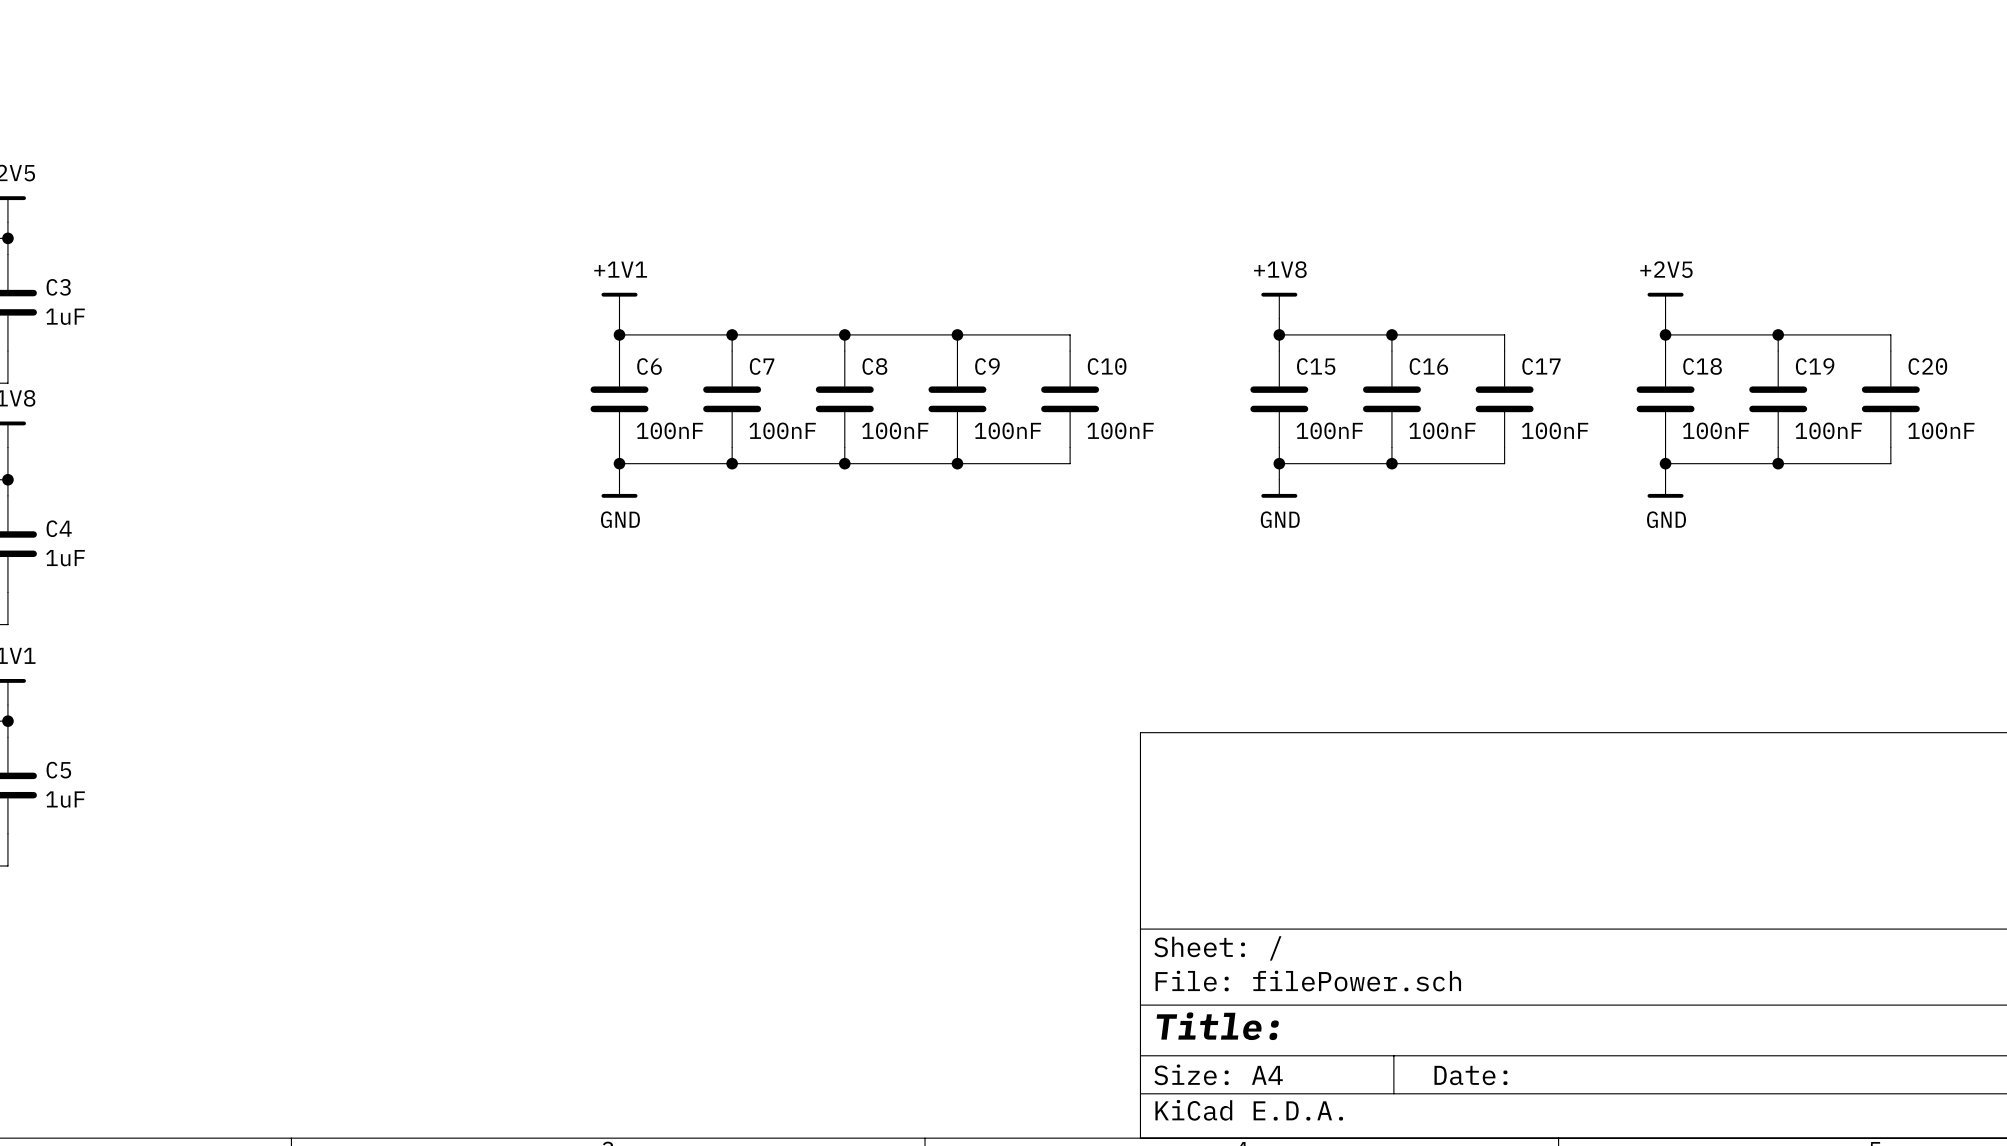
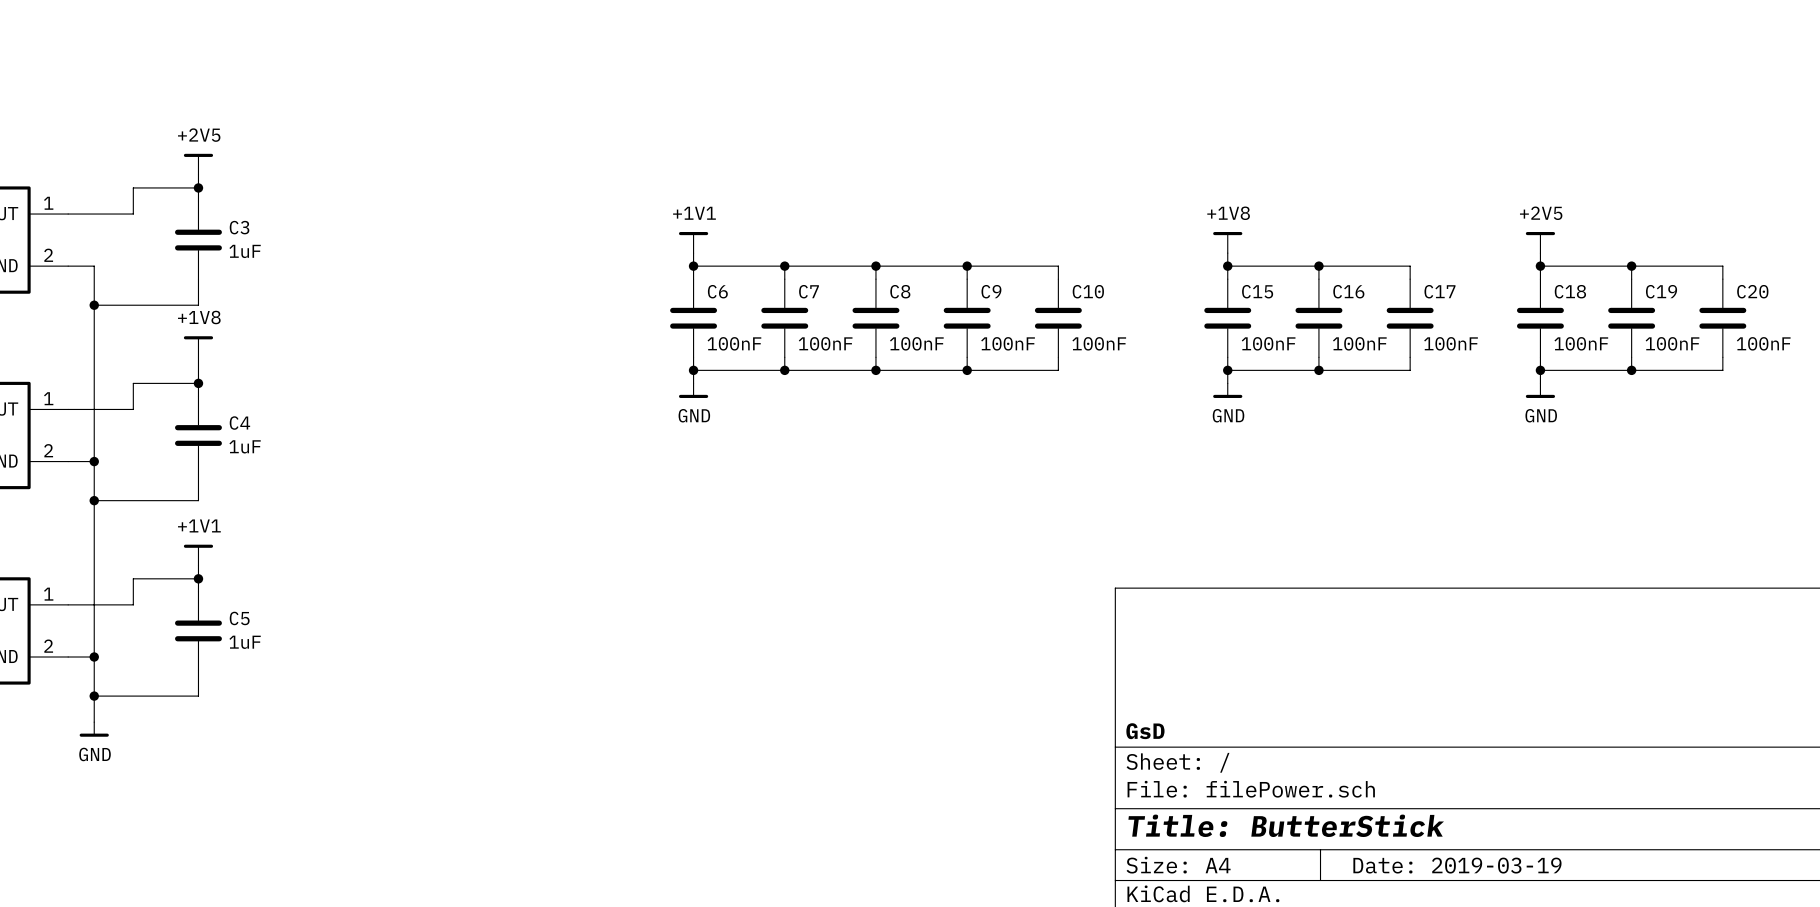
title block: none -> GsD (1145, 731)
title block: Title: (1217, 1026) -> Title: ButterStick (1286, 825)
title block: Date: (1470, 1075) -> Date: 2019-03-19 (1457, 865)

